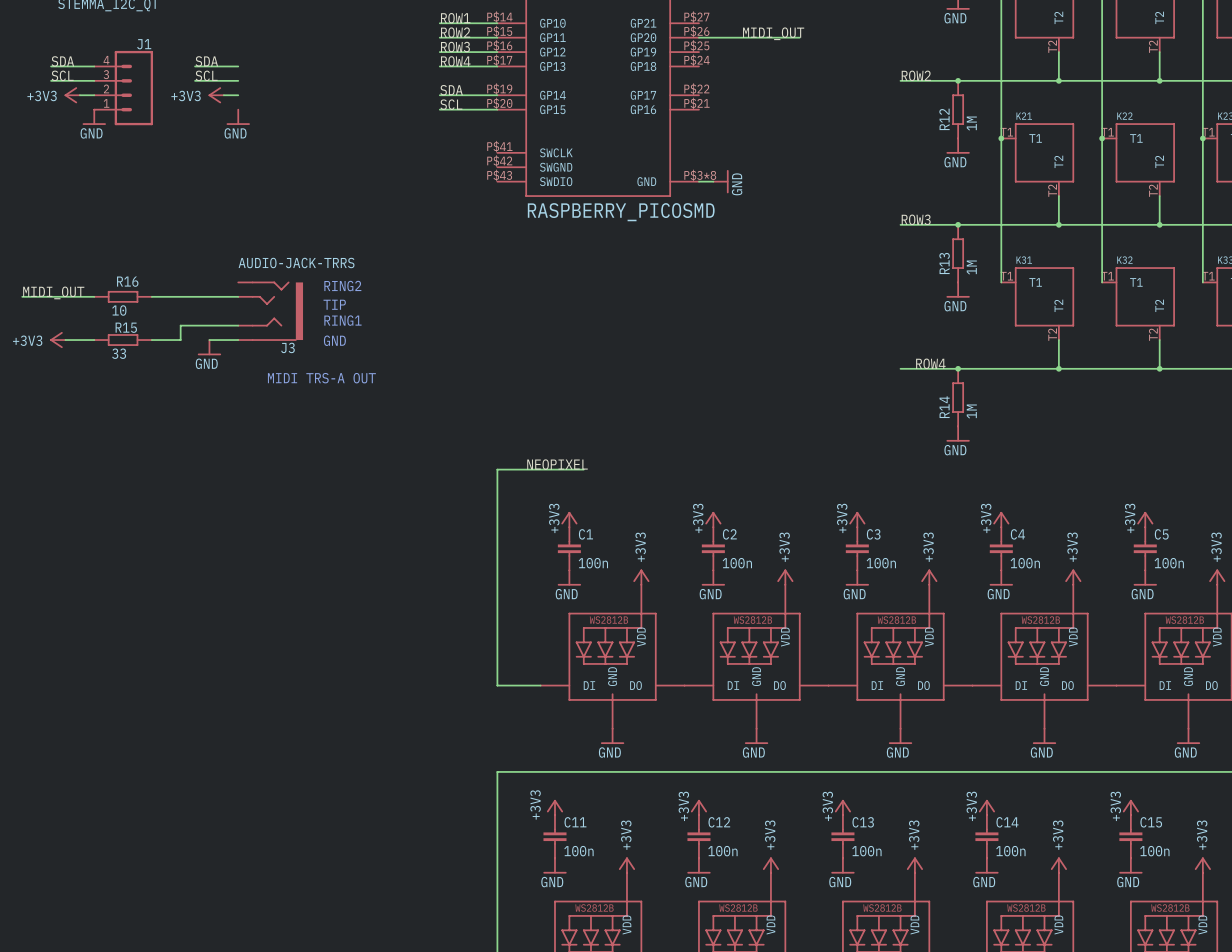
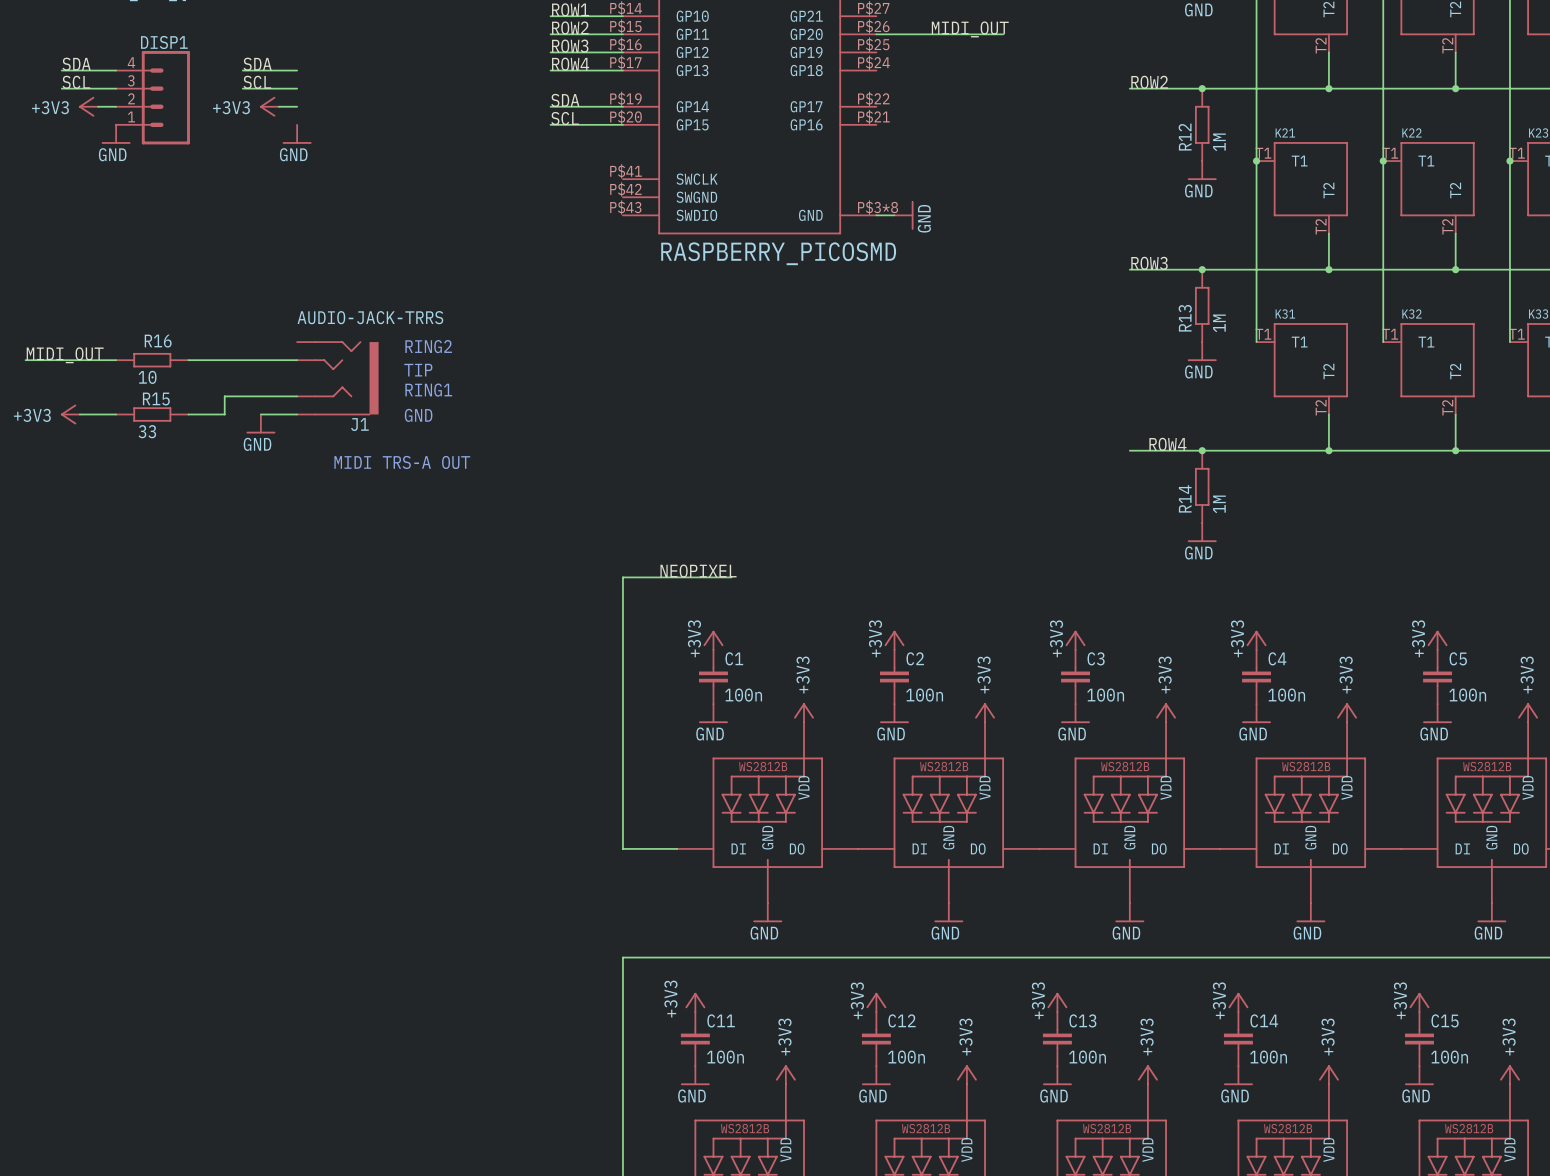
J1 name: J1 (144, 44) -> DISP1 (164, 42)
J3 name: J3 (287, 347) -> J1 (359, 424)

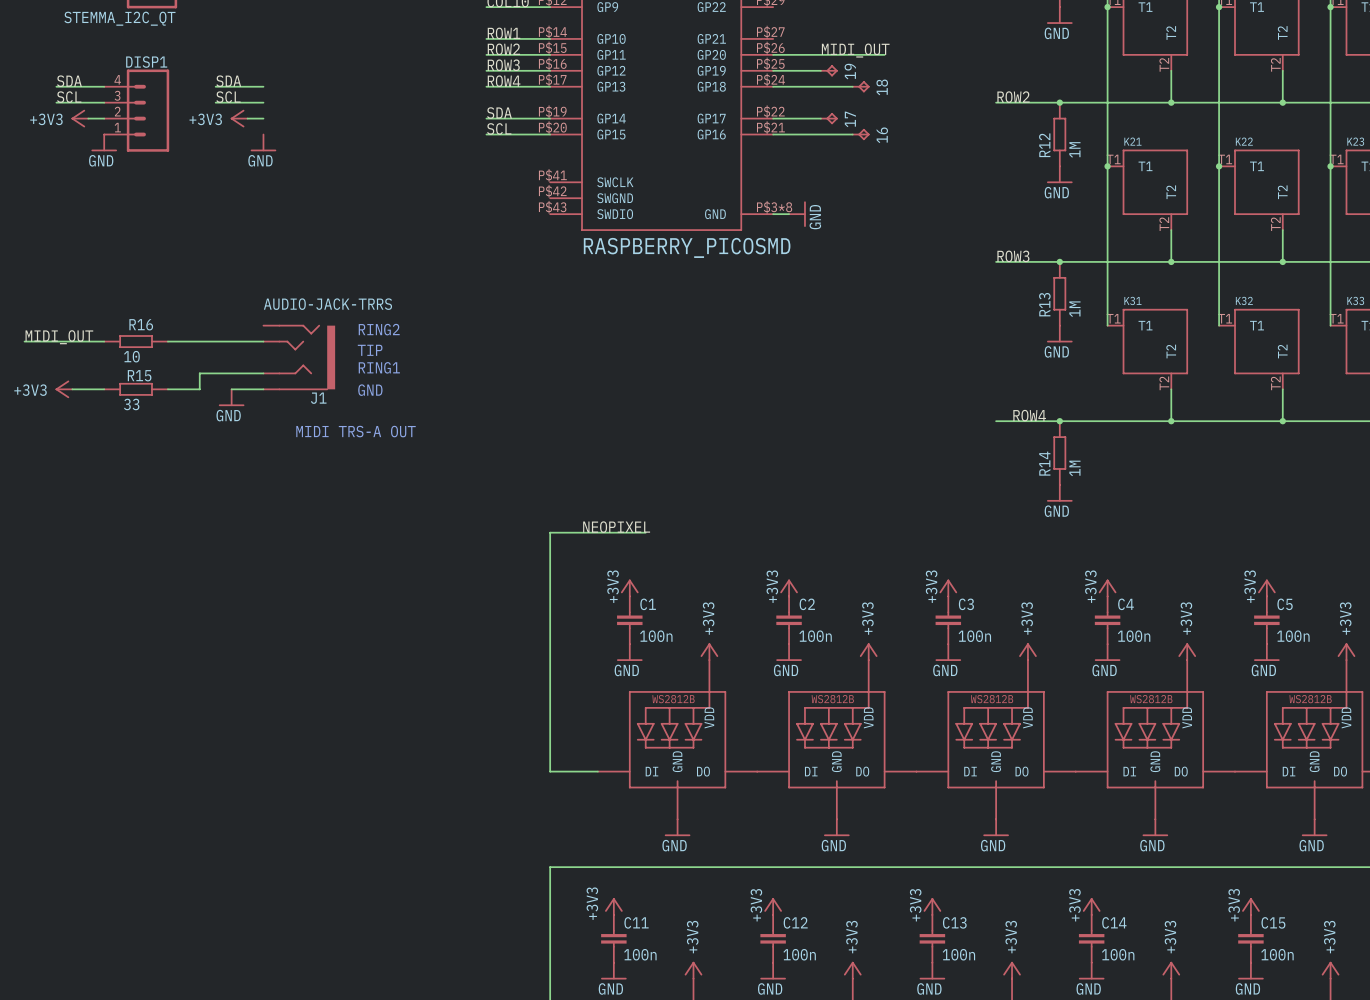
wire: none -> (773, 70) (820, 70)
19: none -> (829, 70)
wire: none -> (773, 86) (852, 86)
18: none -> (861, 86)
wire: none -> (773, 118) (820, 118)
17: none -> (829, 118)
wire: none -> (773, 134) (852, 134)
16: none -> (861, 134)

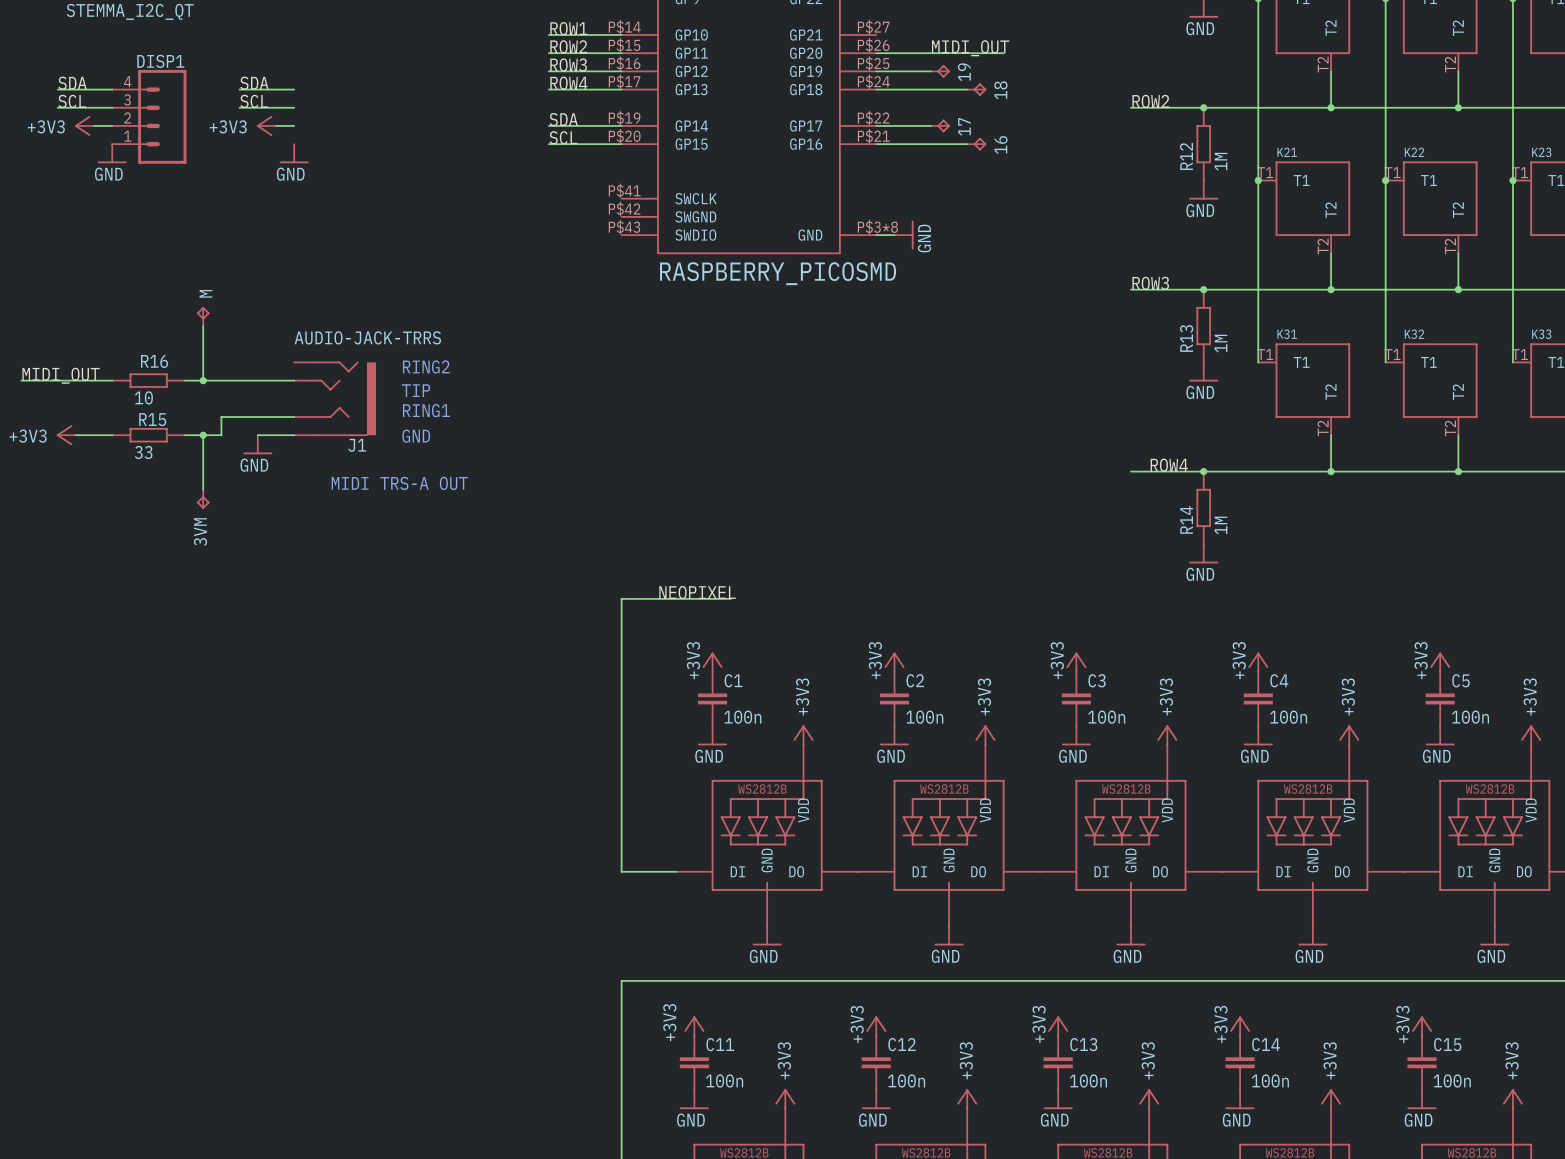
M: none -> (203, 316)
wire: none -> (203, 326) (203, 380)
junction: none -> (203, 380)
wire: none -> (203, 435) (203, 489)
junction: none -> (203, 435)
3VM: none -> (203, 499)

